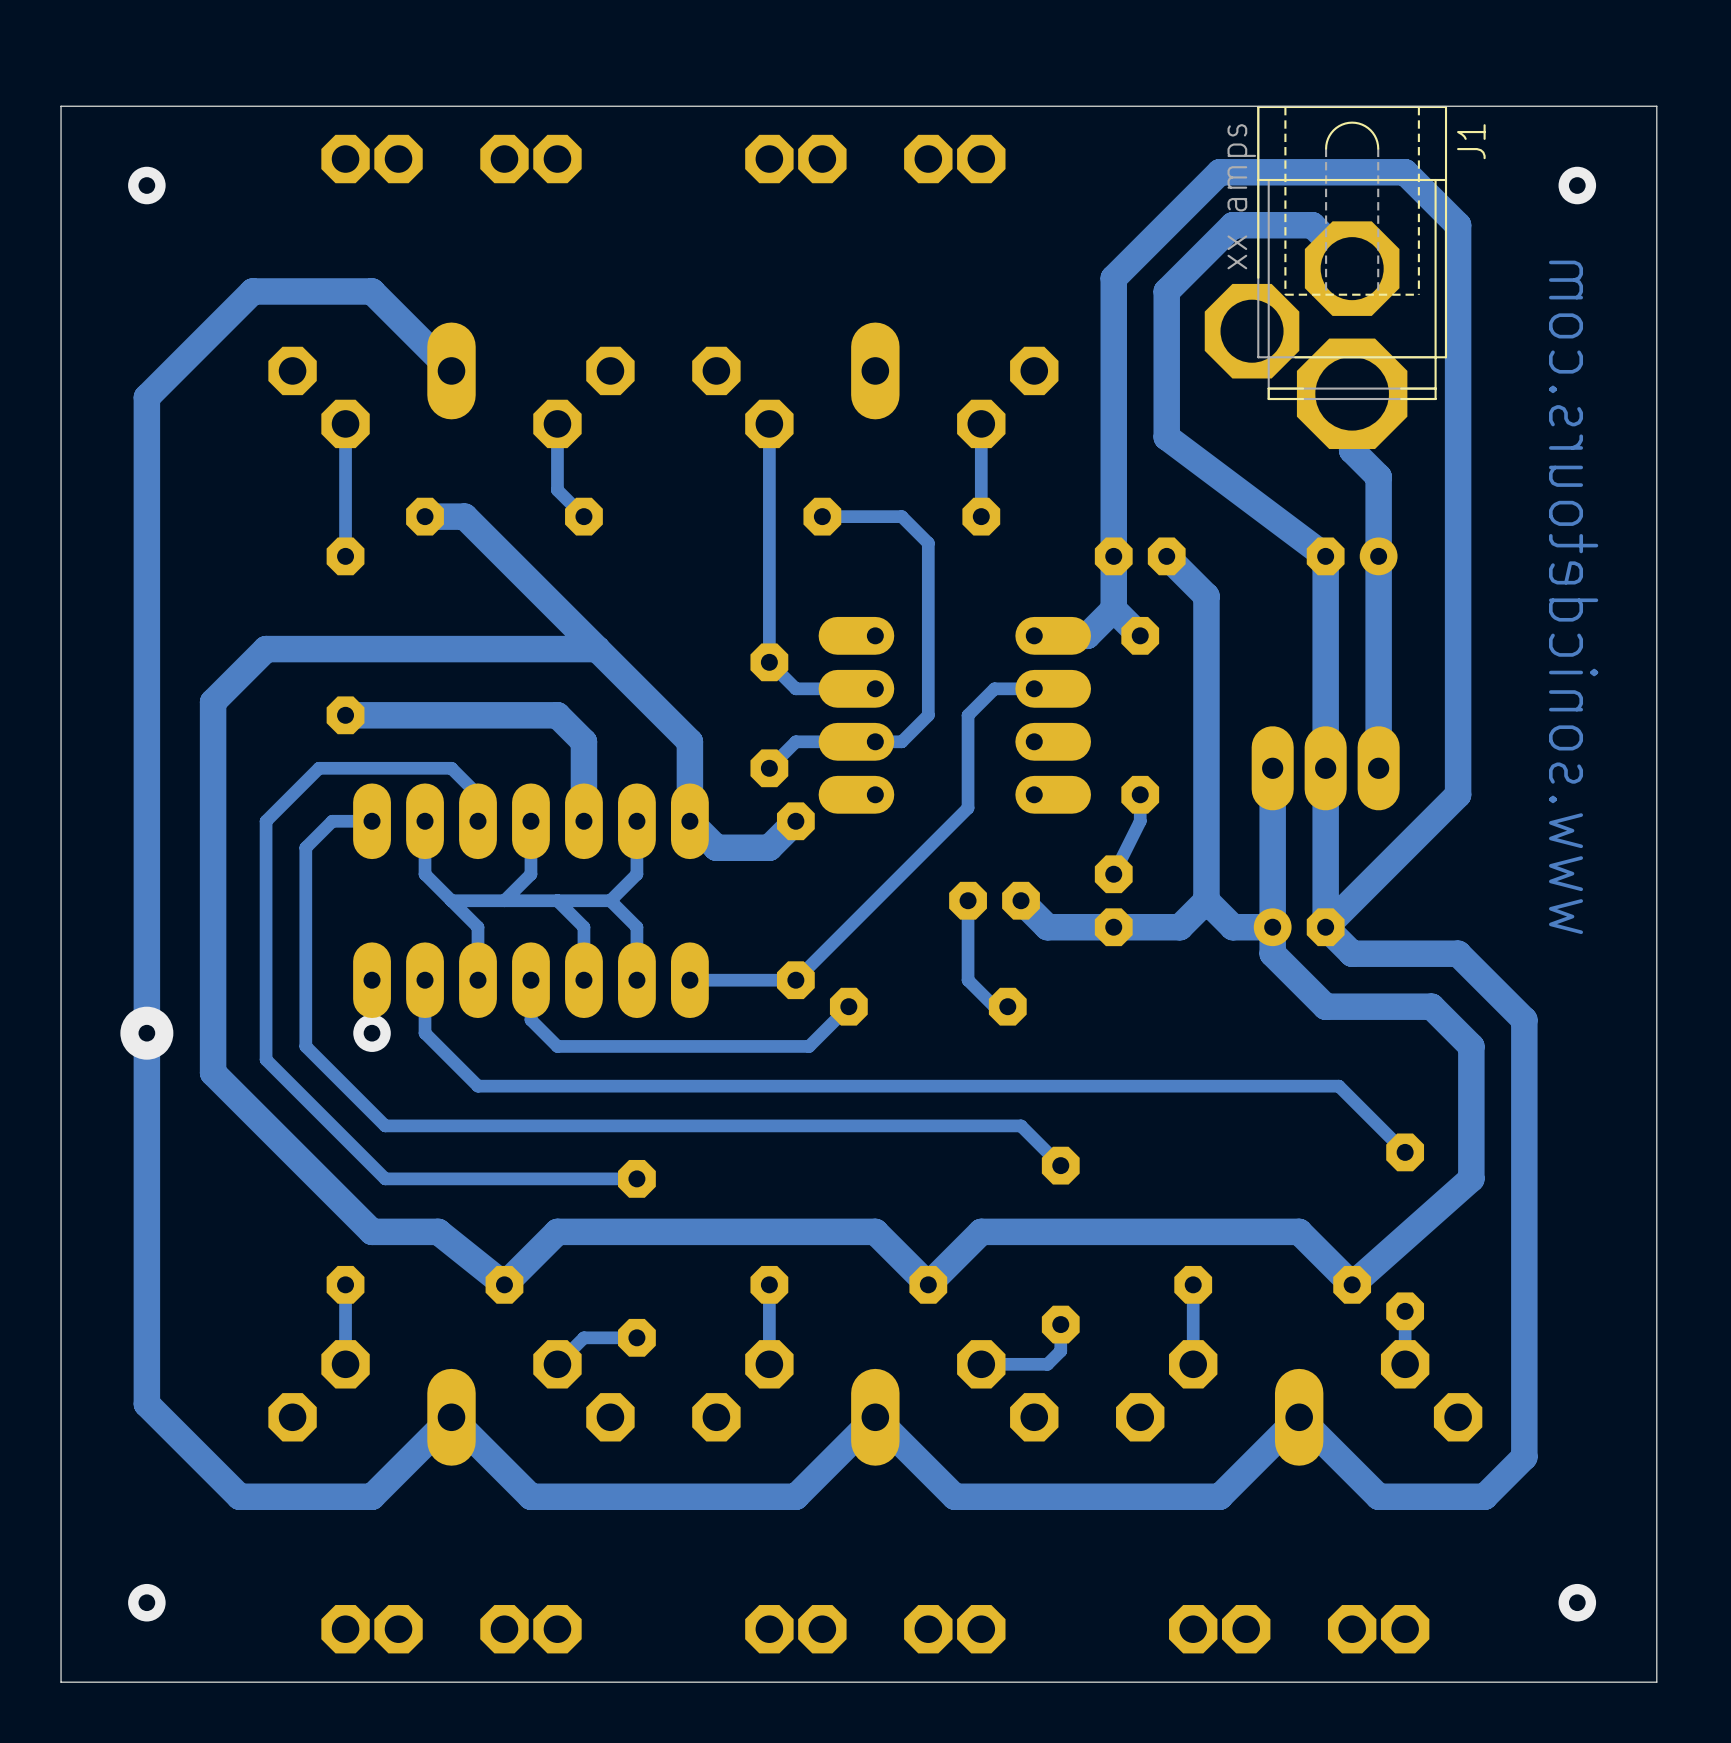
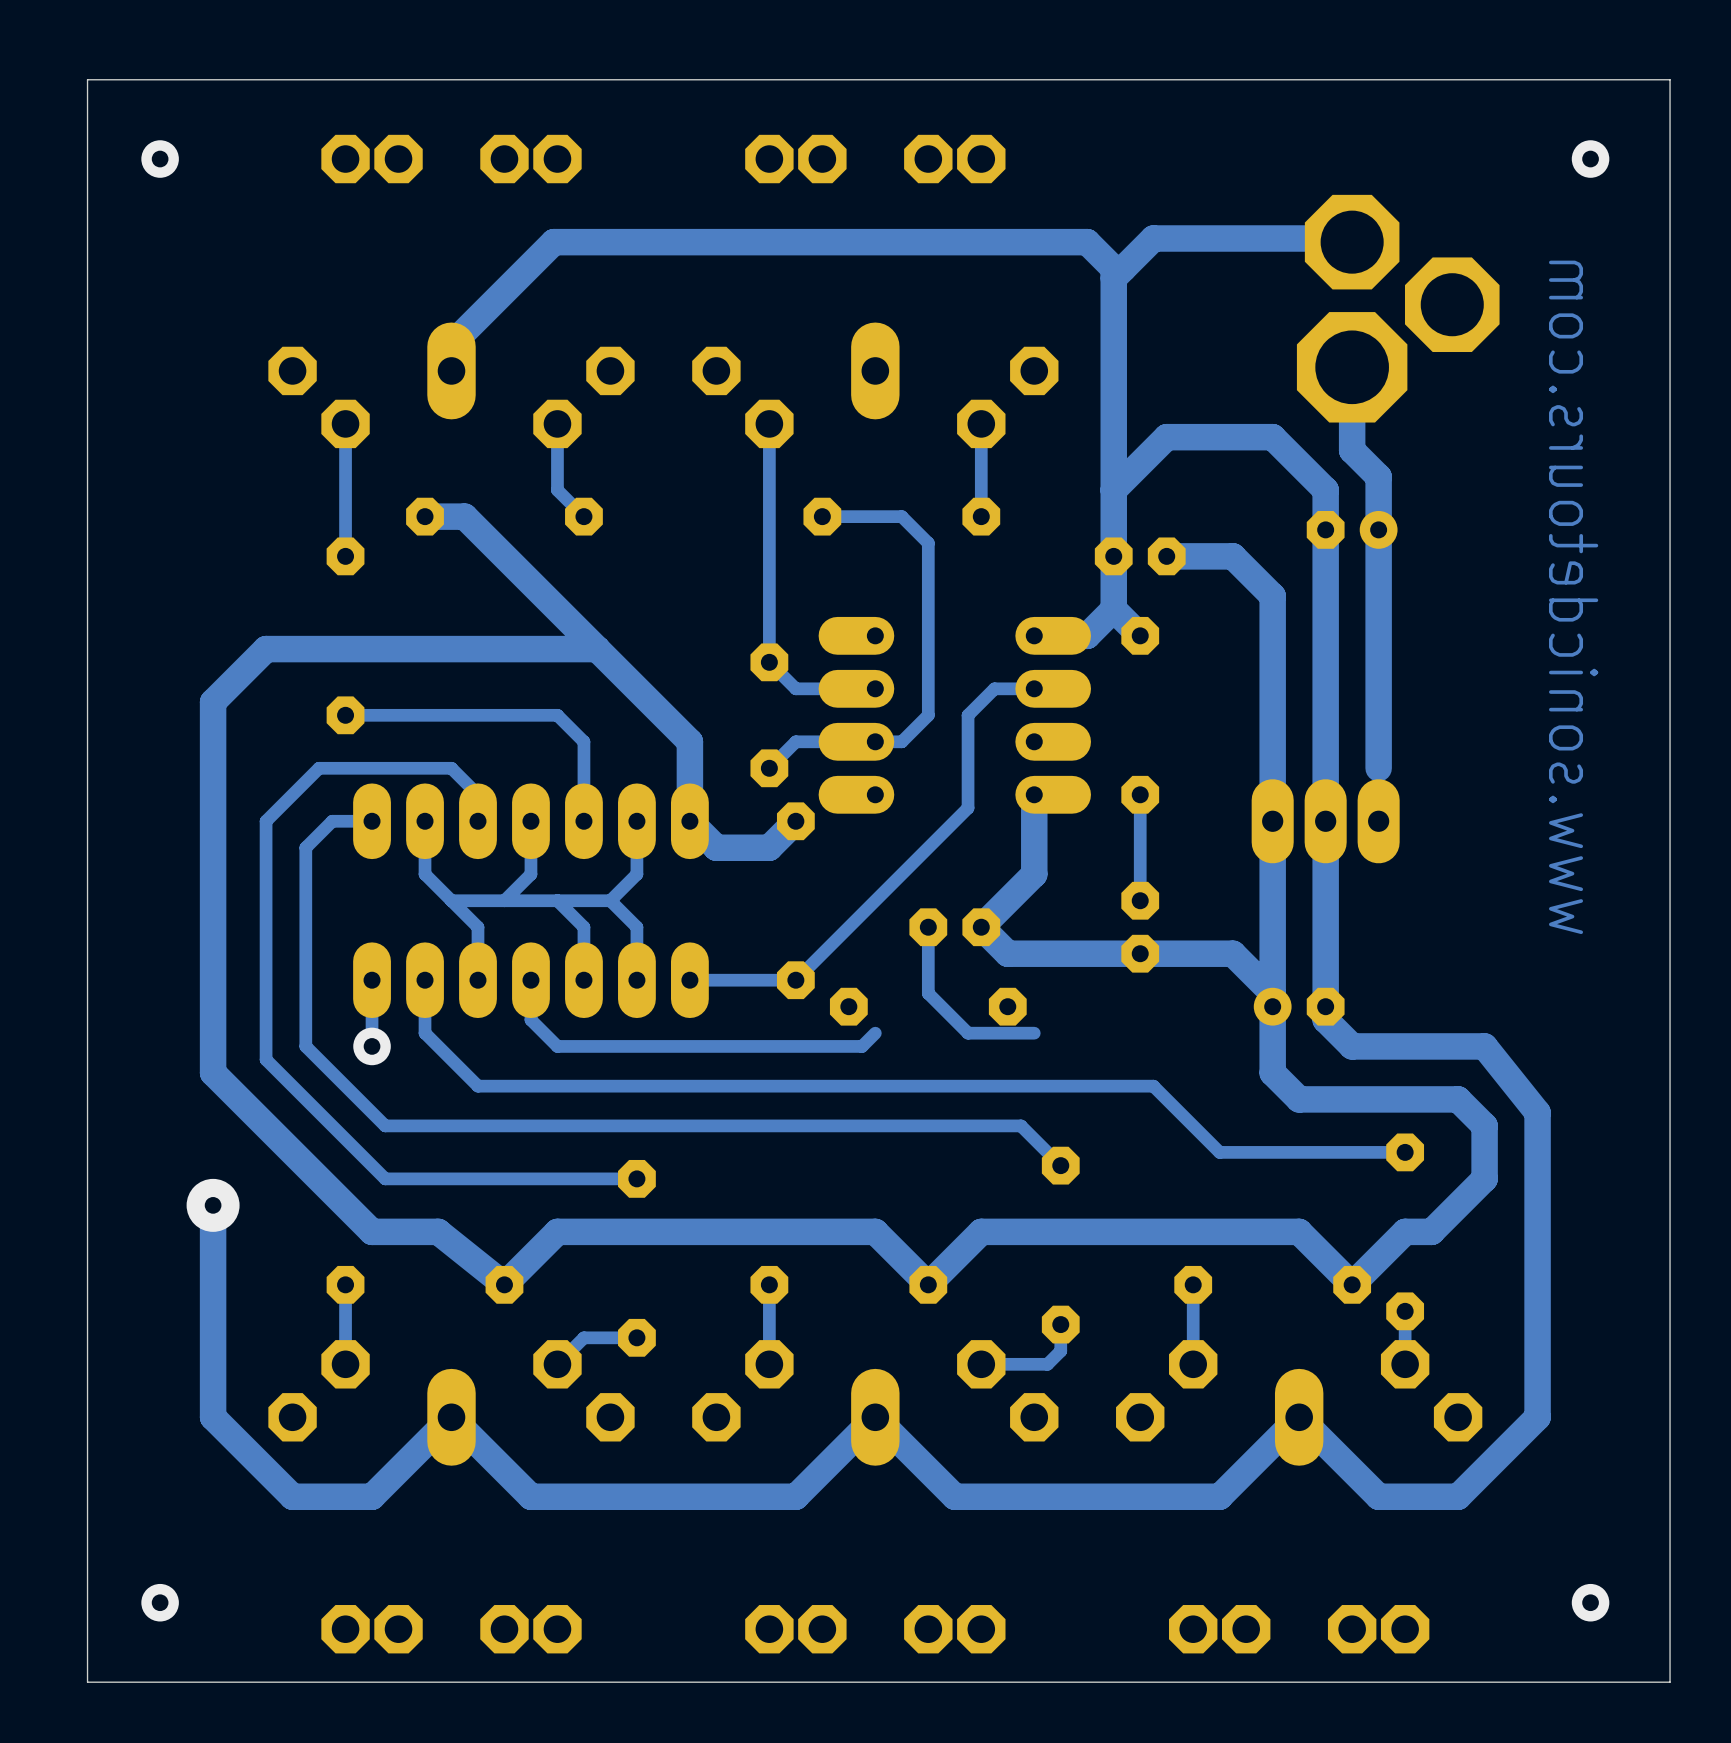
via position: (146, 185) -> (160, 159)
via position: (1577, 185) -> (1590, 159)
track: (1153, 238) (1219, 172) (1405, 172) (1458, 225) (1458, 794) (1325, 927) (1352, 953) (1458, 953) (1524, 1019) (1524, 1457) (1484, 1496) (1458, 1496) -> (1325, 927) (1325, 1019) (1352, 1046) (1484, 1046) (1537, 1112) (1537, 1417) (1458, 1496)
track: none -> (1153, 238) (1348, 238) (1352, 242)
track: (1352, 268) (1352, 264) (1312, 225) (1232, 225) (1166, 291) (1166, 437) (1325, 556) -> (1113, 490) (1166, 437) (1272, 437) (1325, 490) (1325, 556)
J1 side: bottom (1325, 277) -> top (1398, 308)
track: none -> (1113, 278) (1113, 268) (1087, 242) (553, 242) (451, 344)
track: (451, 370) (372, 291) (252, 291) (146, 397) (146, 1404) (239, 1496) (292, 1496) -> (213, 1205) (213, 1417) (292, 1496)
track: (1166, 556) (1206, 596) (1206, 900) -> (1166, 556) (1232, 556) (1272, 596) (1272, 768)
part position: (1352, 556) -> (1352, 529)
track width: thick (345, 715) (557, 715) (583, 741) (583, 821) -> thin (345, 715) (557, 715) (583, 741) (583, 821)
part position: (1325, 768) -> (1325, 821)
track: none -> (1034, 794) (1034, 874) (981, 927) (1007, 953) (1232, 953) (1272, 993) (1272, 953)
track: (1140, 821) (1113, 874) -> (1140, 821) (1140, 900)
track: (968, 900) (968, 980) (994, 1006) (1007, 1006) -> none
part position: (994, 900) -> (954, 927)
part position: (1113, 900) -> (1140, 927)
track: (1206, 900) (1232, 927) (1272, 927) -> none
track: (1206, 900) (1179, 927) (1047, 927) (1021, 900) -> none
track: none -> (928, 927) (928, 993) (968, 1033) (1034, 1033)
part position: (1299, 927) -> (1299, 1006)
track: (1272, 953) (1325, 1006) (1431, 1006) (1471, 1046) (1471, 1178) (1352, 1284) -> (1272, 1006) (1272, 1072) (1299, 1099) (1458, 1099) (1484, 1125) (1484, 1178) (1431, 1231) (1405, 1231) (1352, 1284)
track: (848, 1006) (809, 1046) -> (875, 1033) (862, 1046) (809, 1046)
via: (146, 1033) -> none
via position: (372, 1033) -> (372, 1046)
track: (1153, 1086) (1338, 1086) (1405, 1152) -> (1153, 1086) (1219, 1152) (1405, 1152)
via: none -> (213, 1205)
via position: (146, 1602) -> (160, 1602)
via position: (1577, 1602) -> (1590, 1602)
board edge: (1656, 1682) (1656, 106) (61, 106) (61, 1682) (87, 1682) -> (1656, 1682) (1670, 1682) (1670, 79) (87, 79) (87, 1682)

